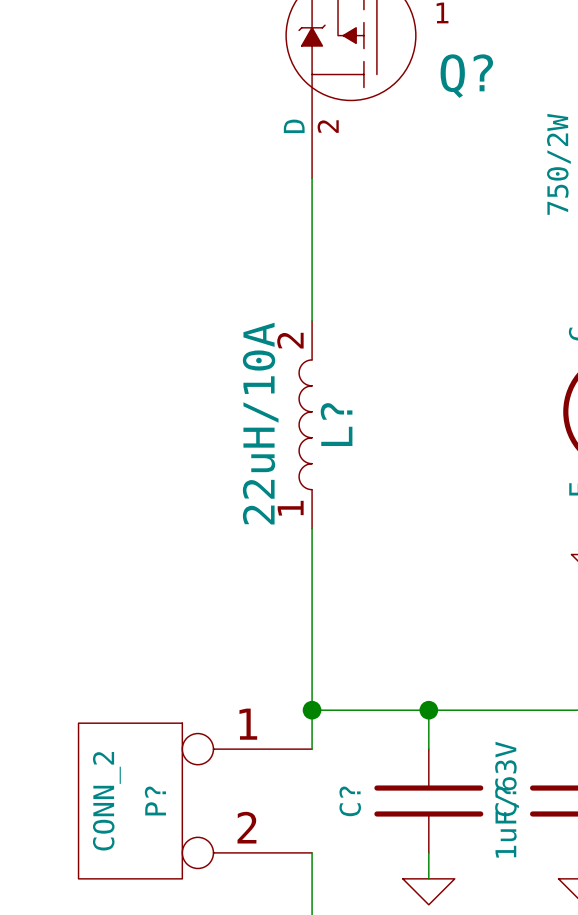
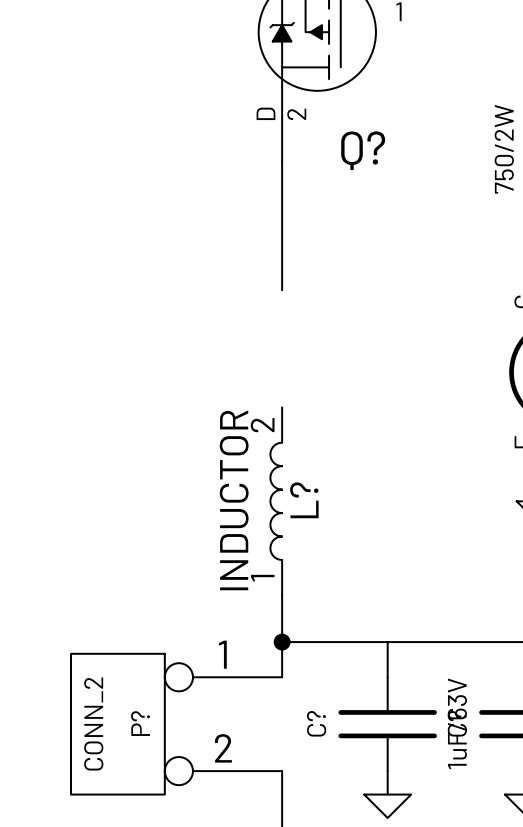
Q? name position: Q? (466, 76) -> Q? (363, 150)
L?: 22uH/10A (305, 424) -> none
wire: (312, 528) (312, 658) -> none
L?: none -> INDUCTOR (276, 501)
junction: (428, 710) -> none

